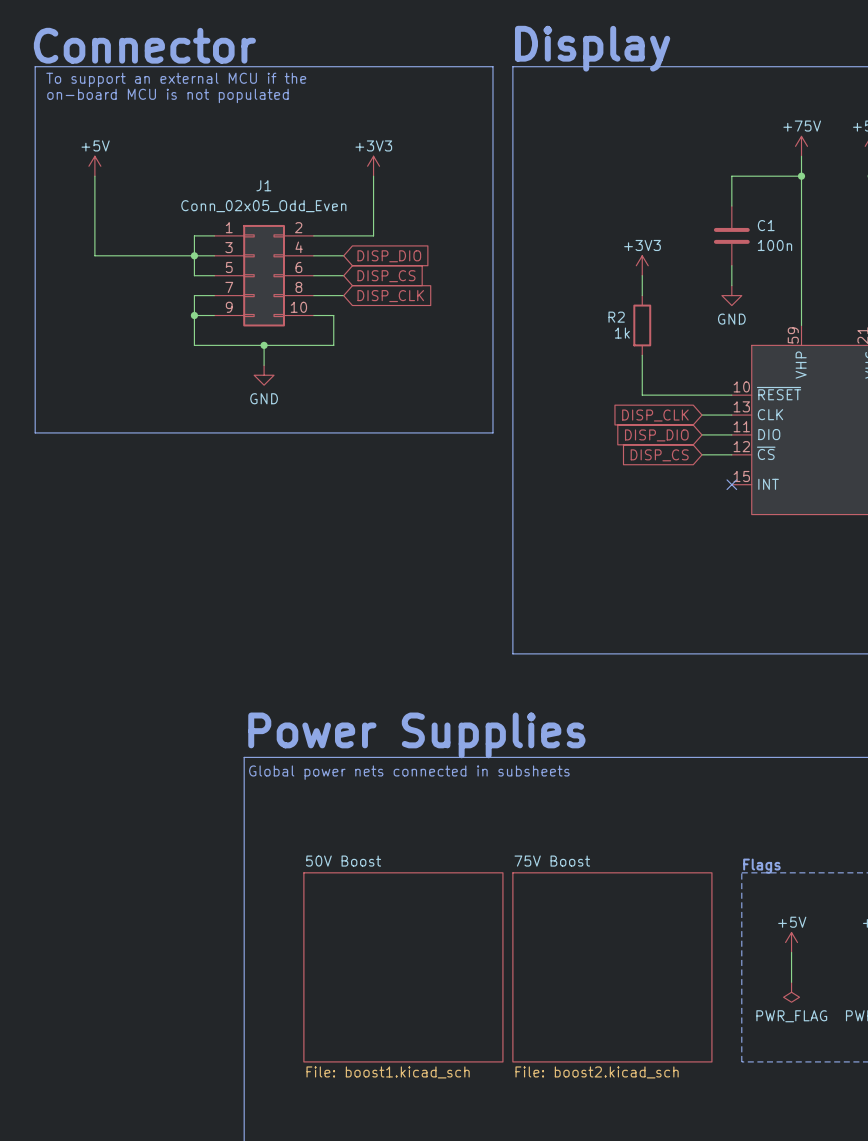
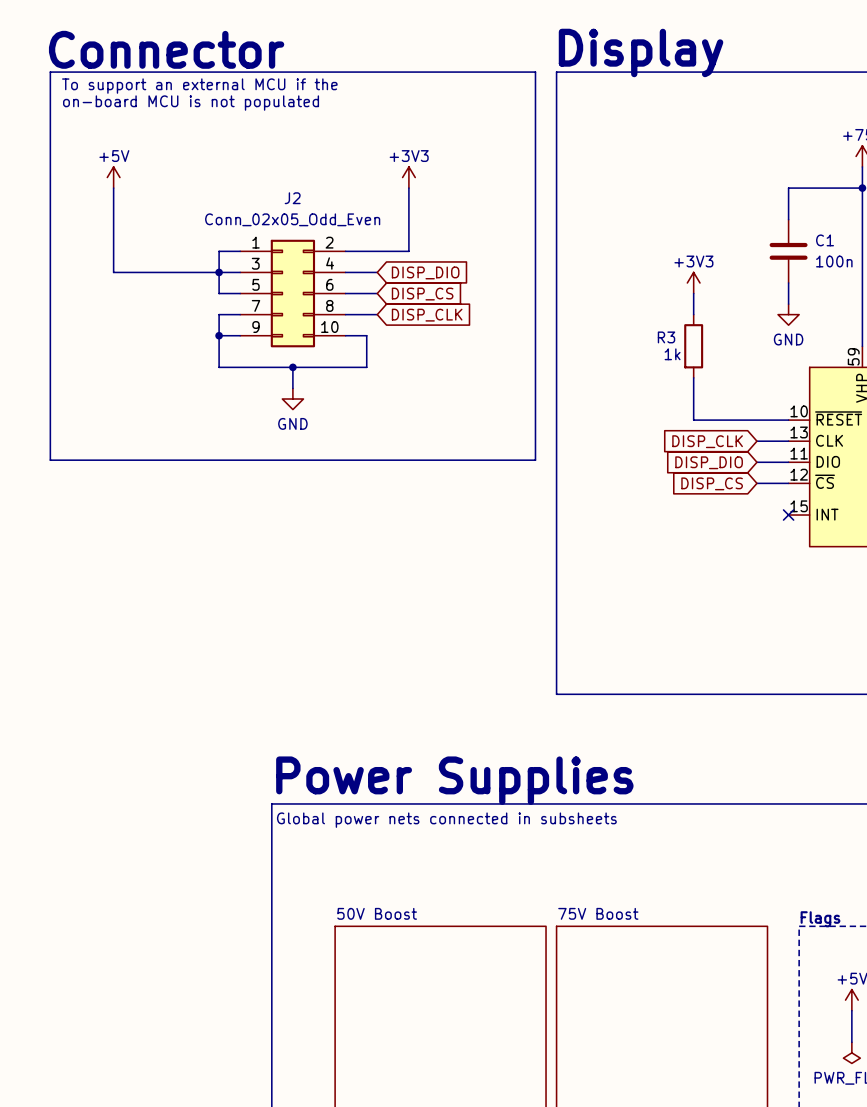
J1 name: J1 (263, 185) -> J2 (292, 198)
R2 name: R2 (616, 317) -> R3 (666, 337)

